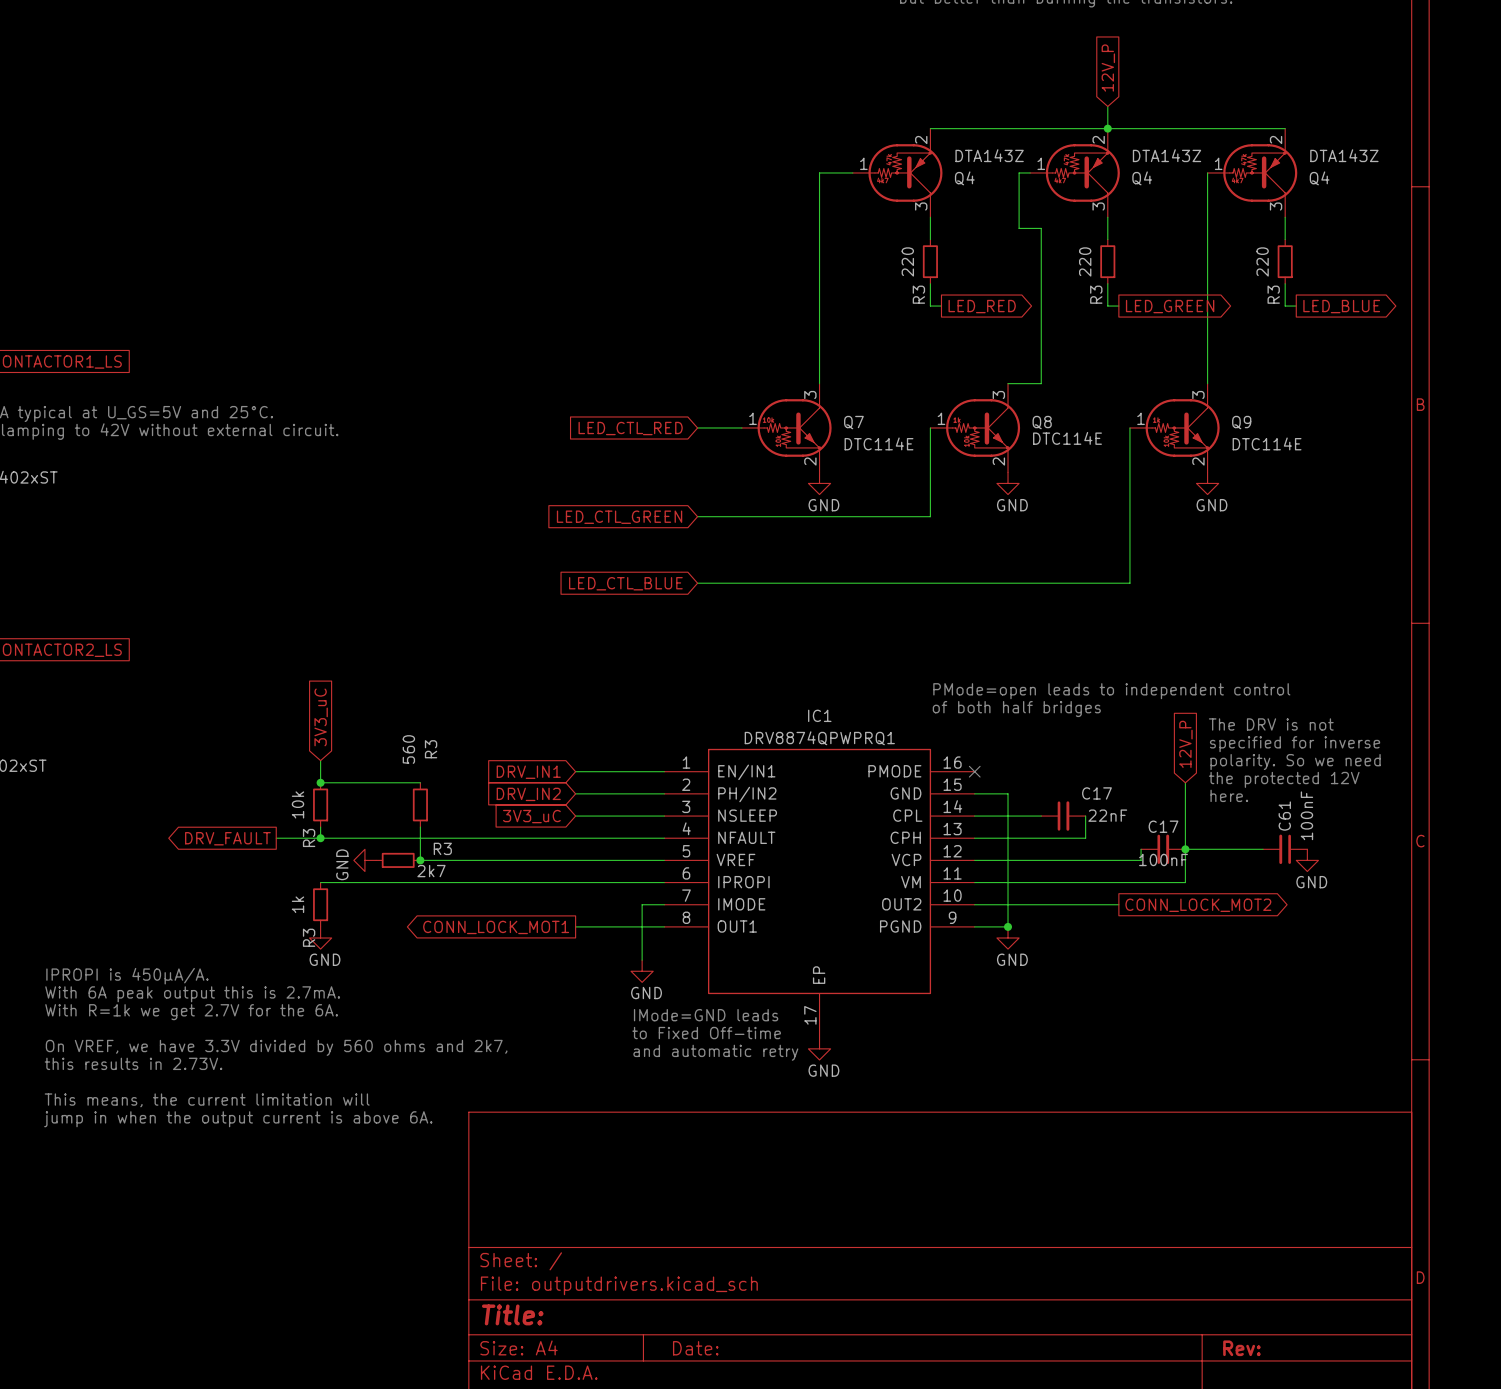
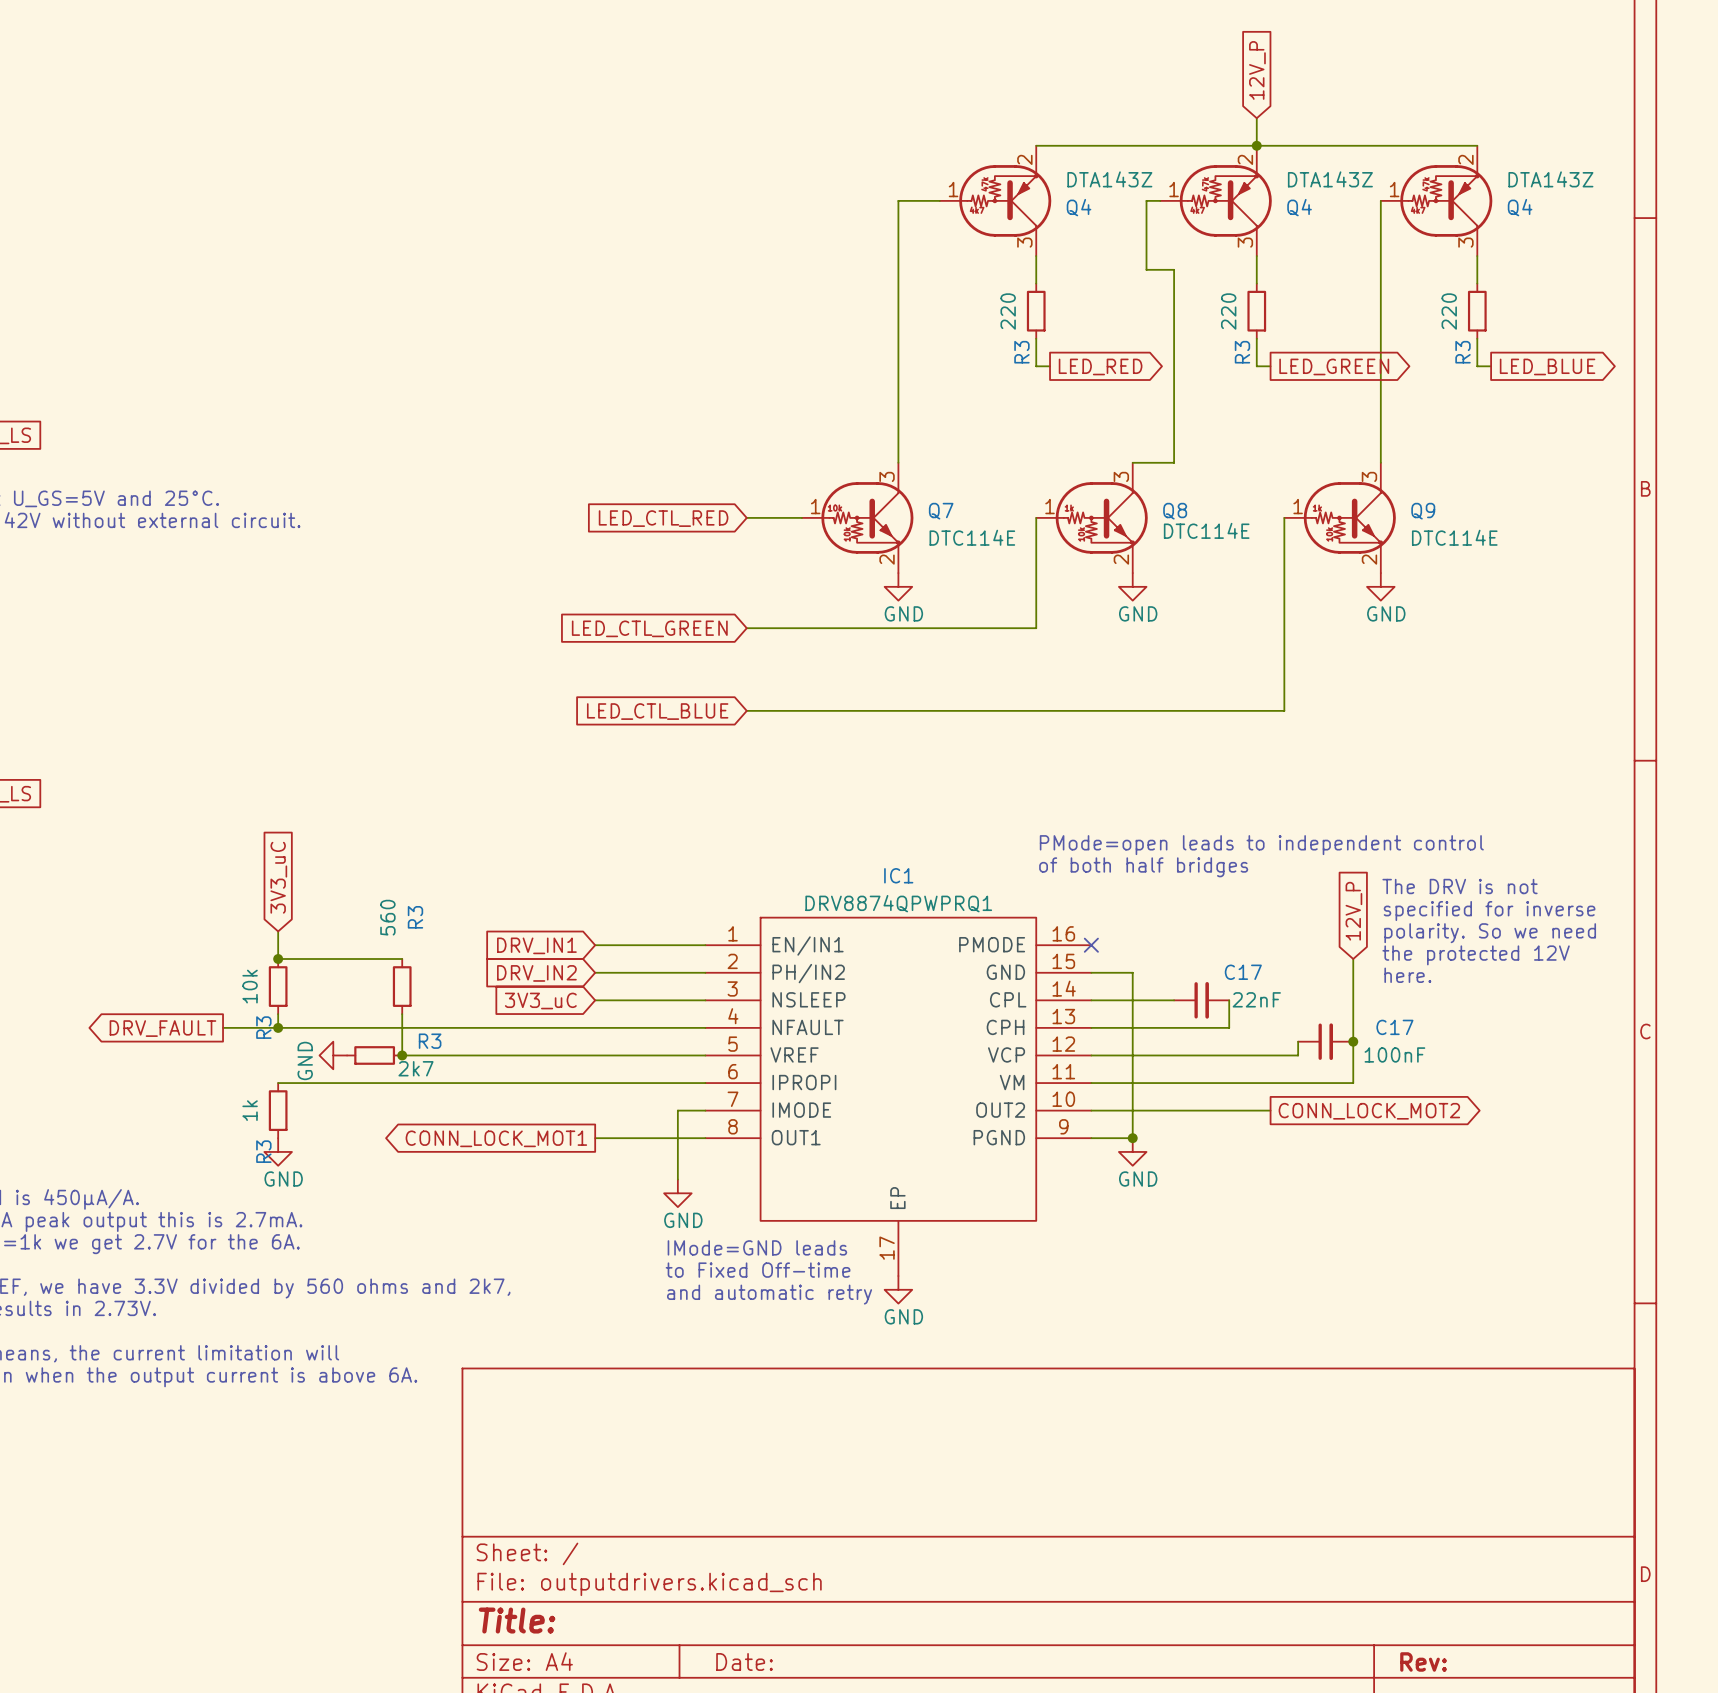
C17 name position: C17 (1163, 826) -> C17 (1394, 1027)
wire: (1185, 849) (1263, 849) -> none
C61: 100nF (1285, 849) -> none
C17 value position: 100nF (1163, 859) -> 100nF (1394, 1054)
power symbol: GND (1307, 860) -> none

